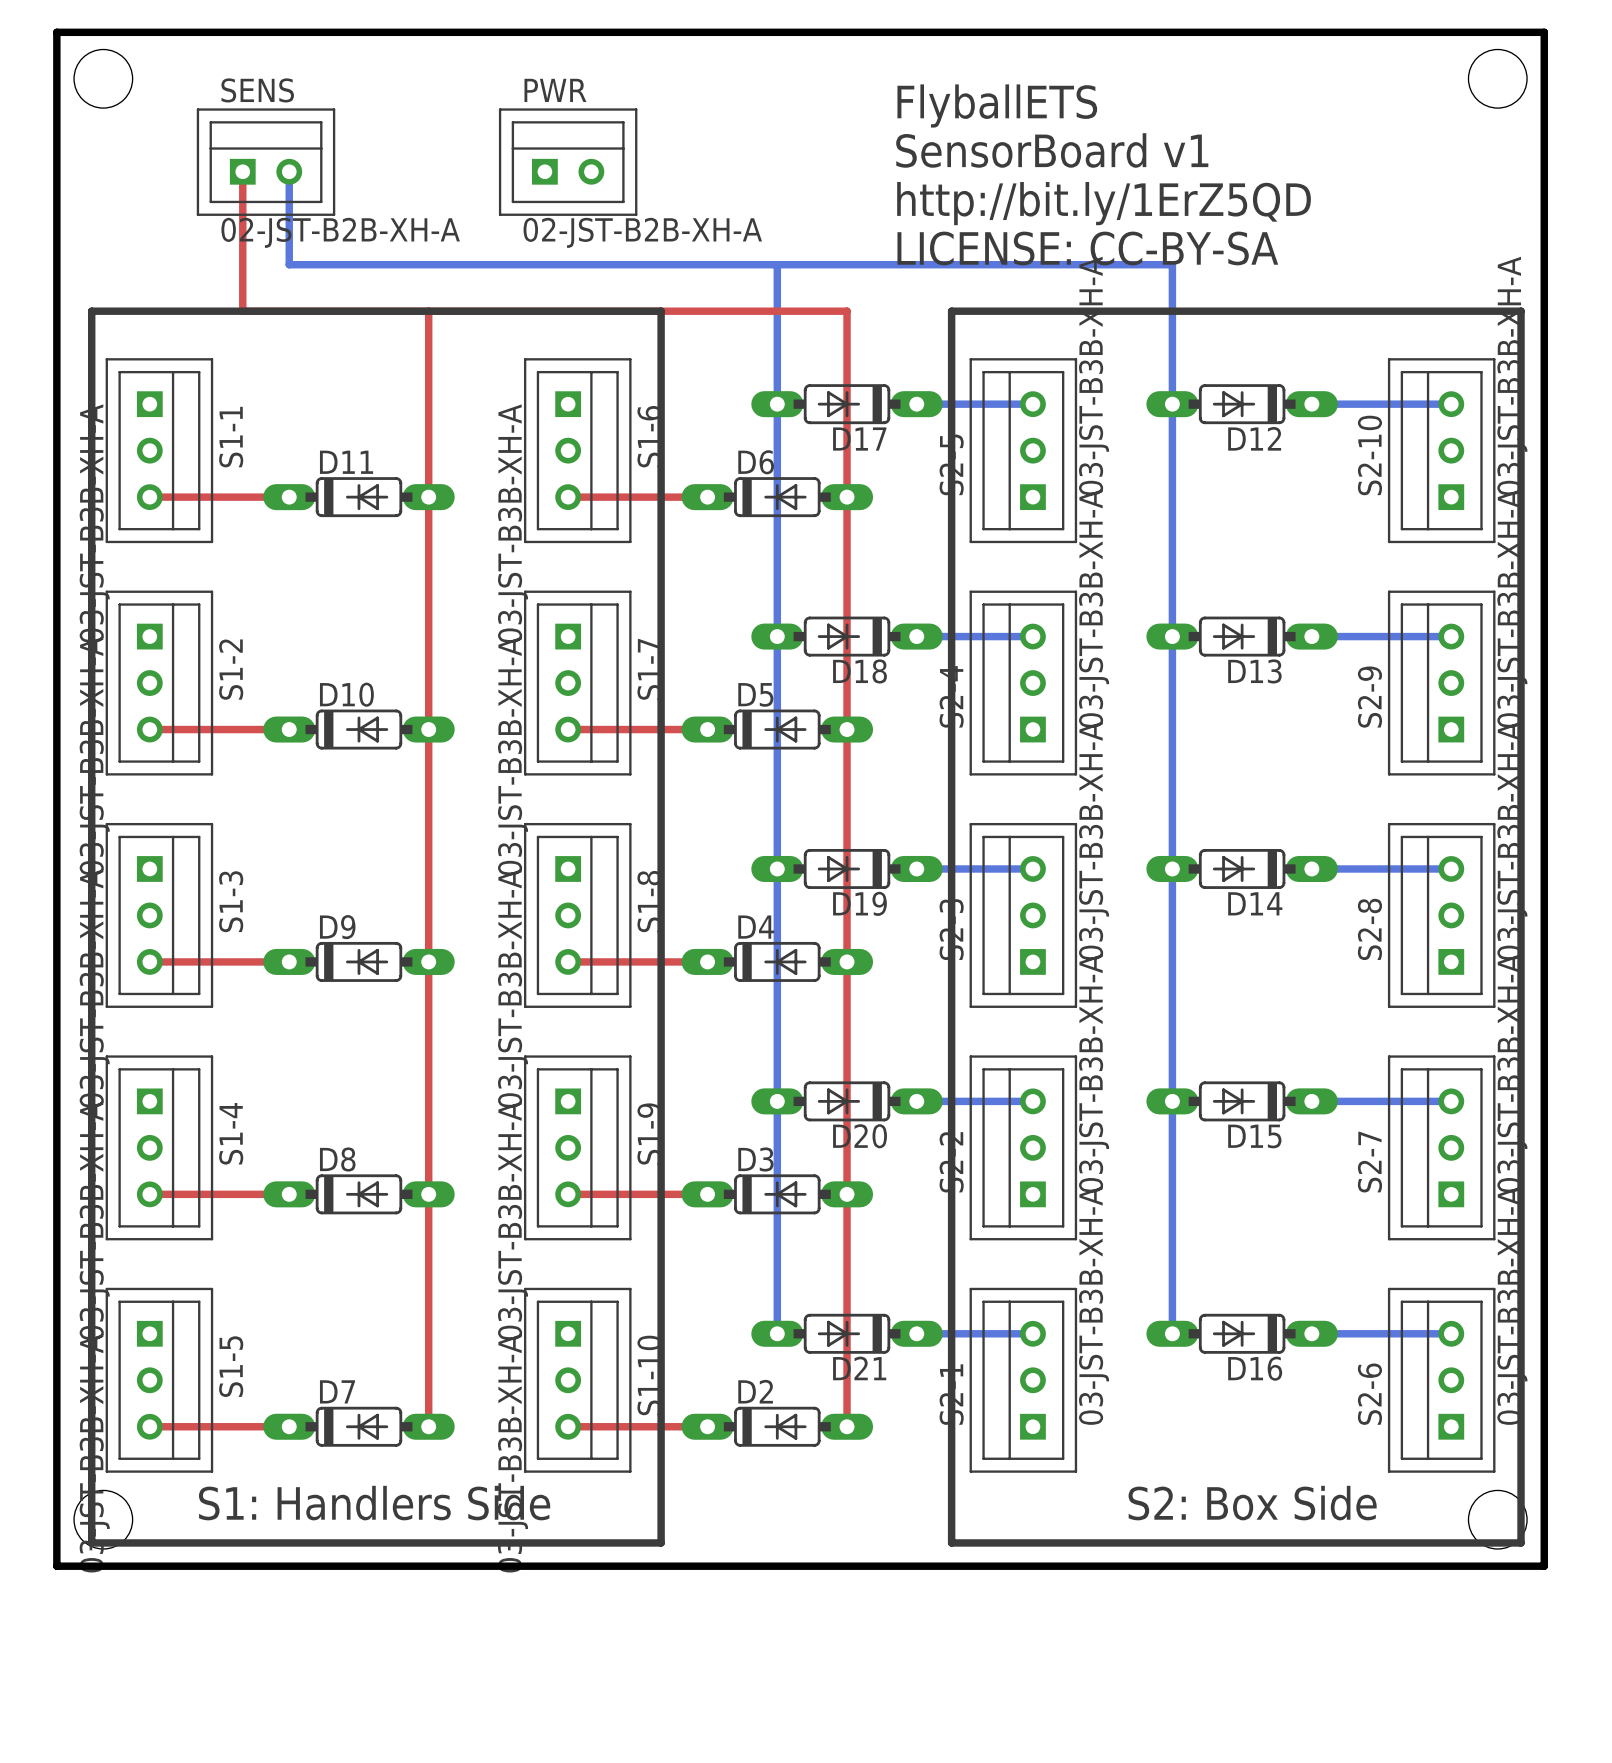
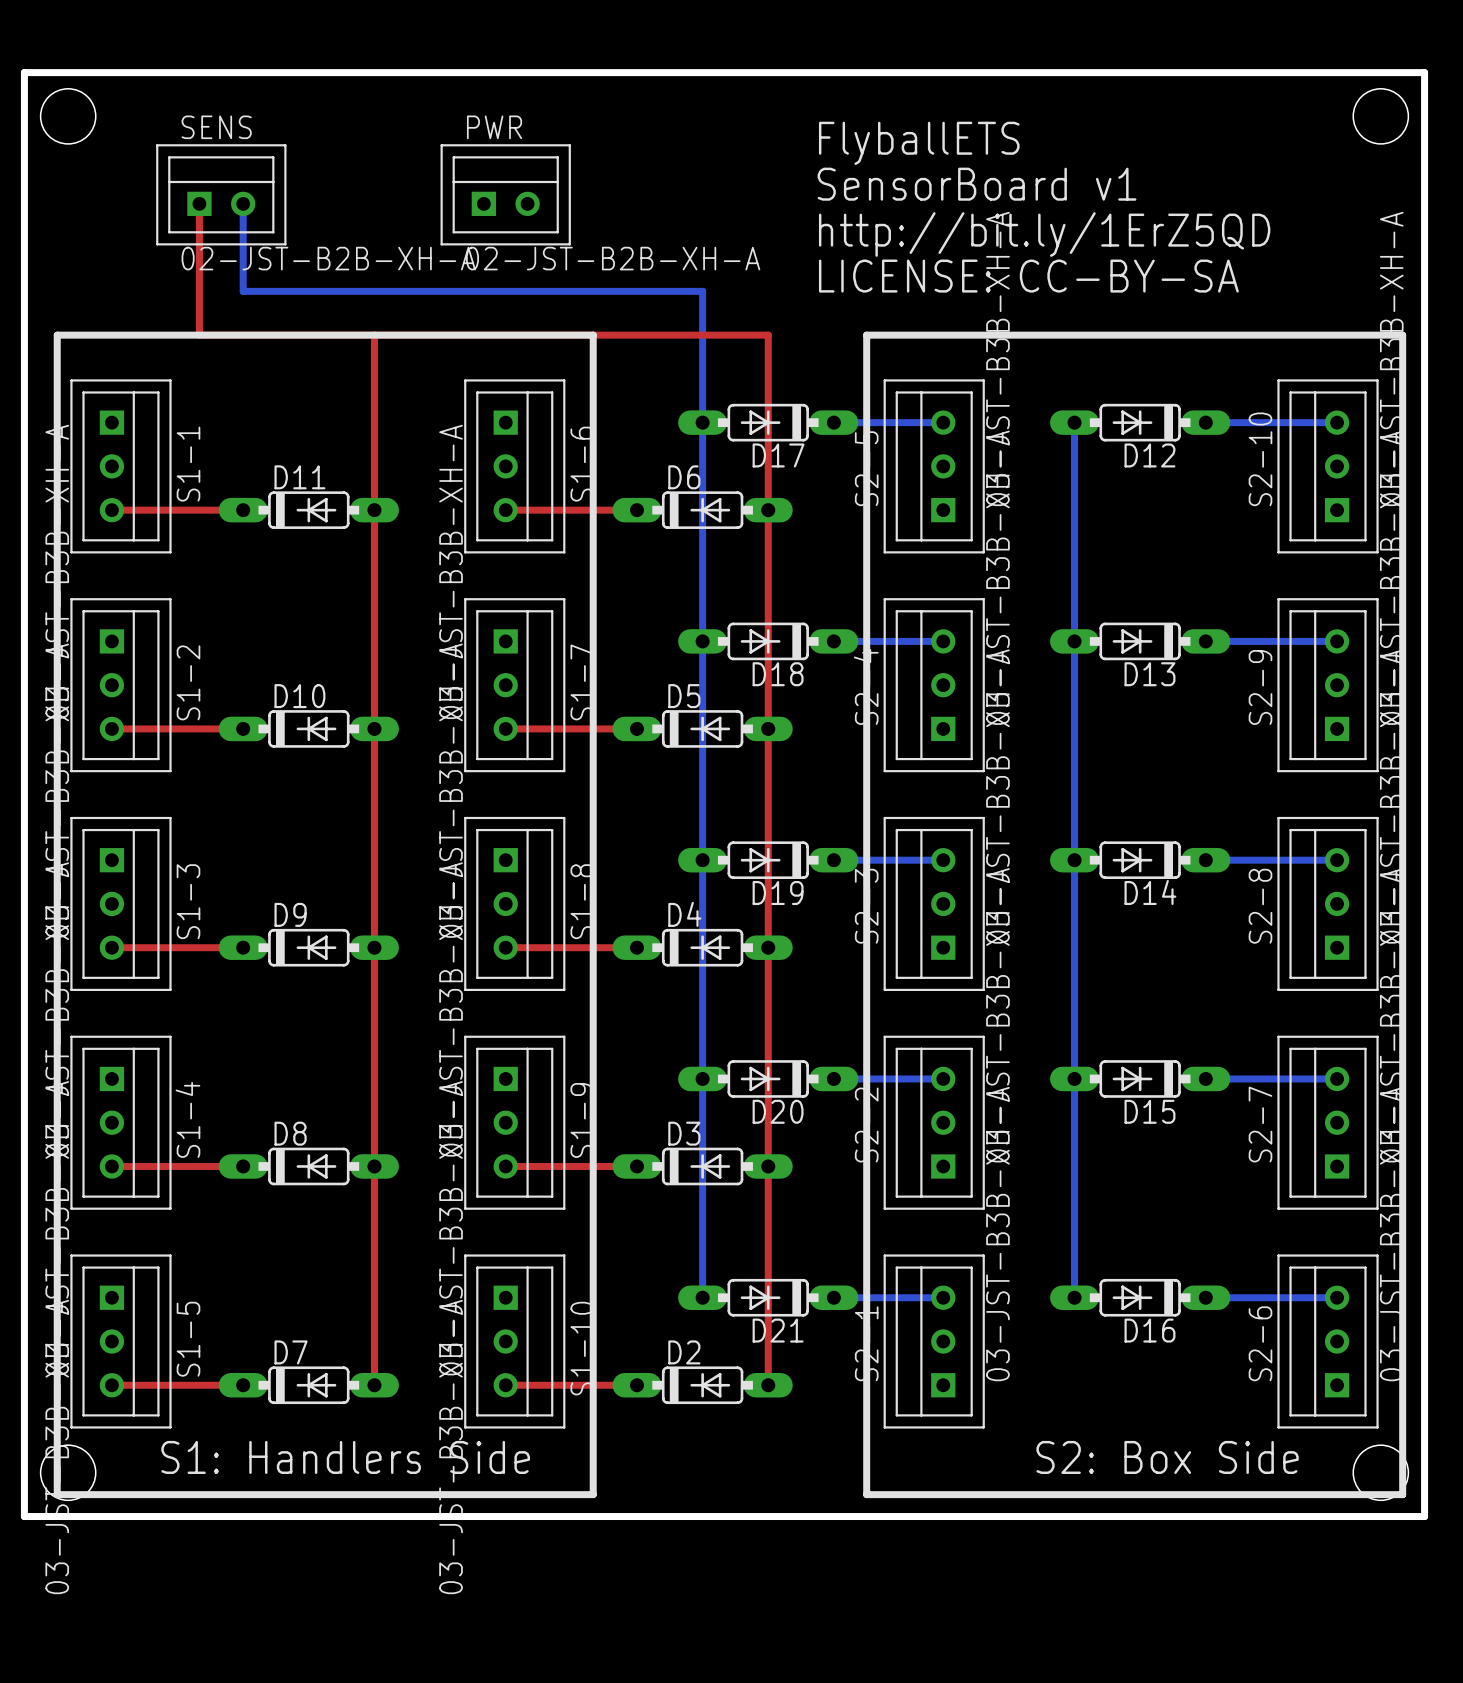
bottom track: (777, 264) (1172, 264) (1172, 404) -> none

